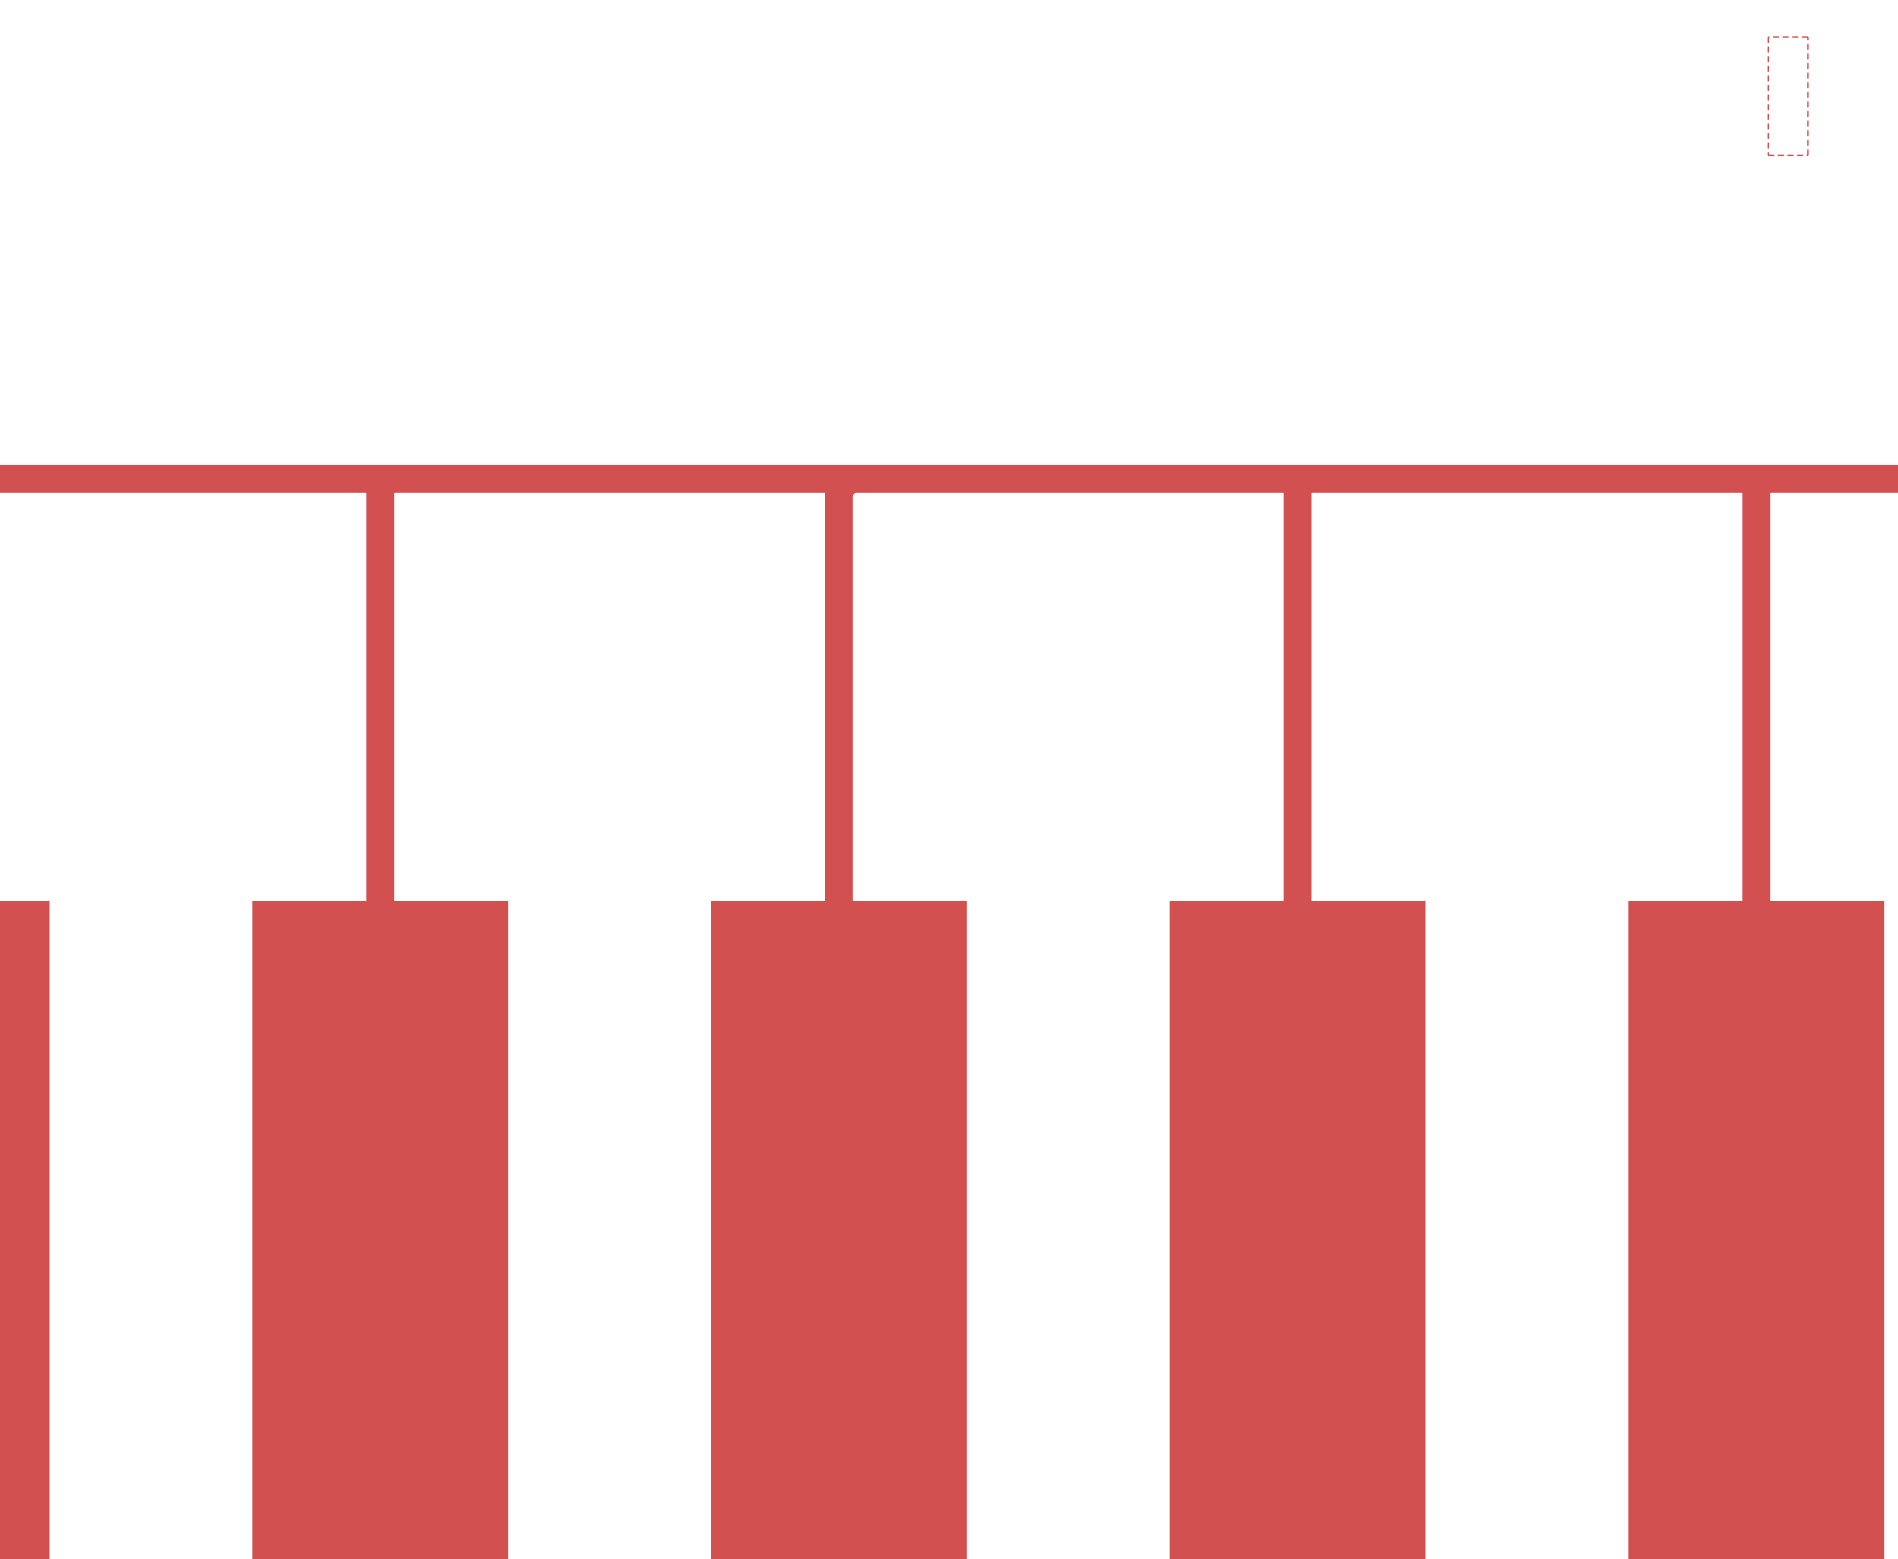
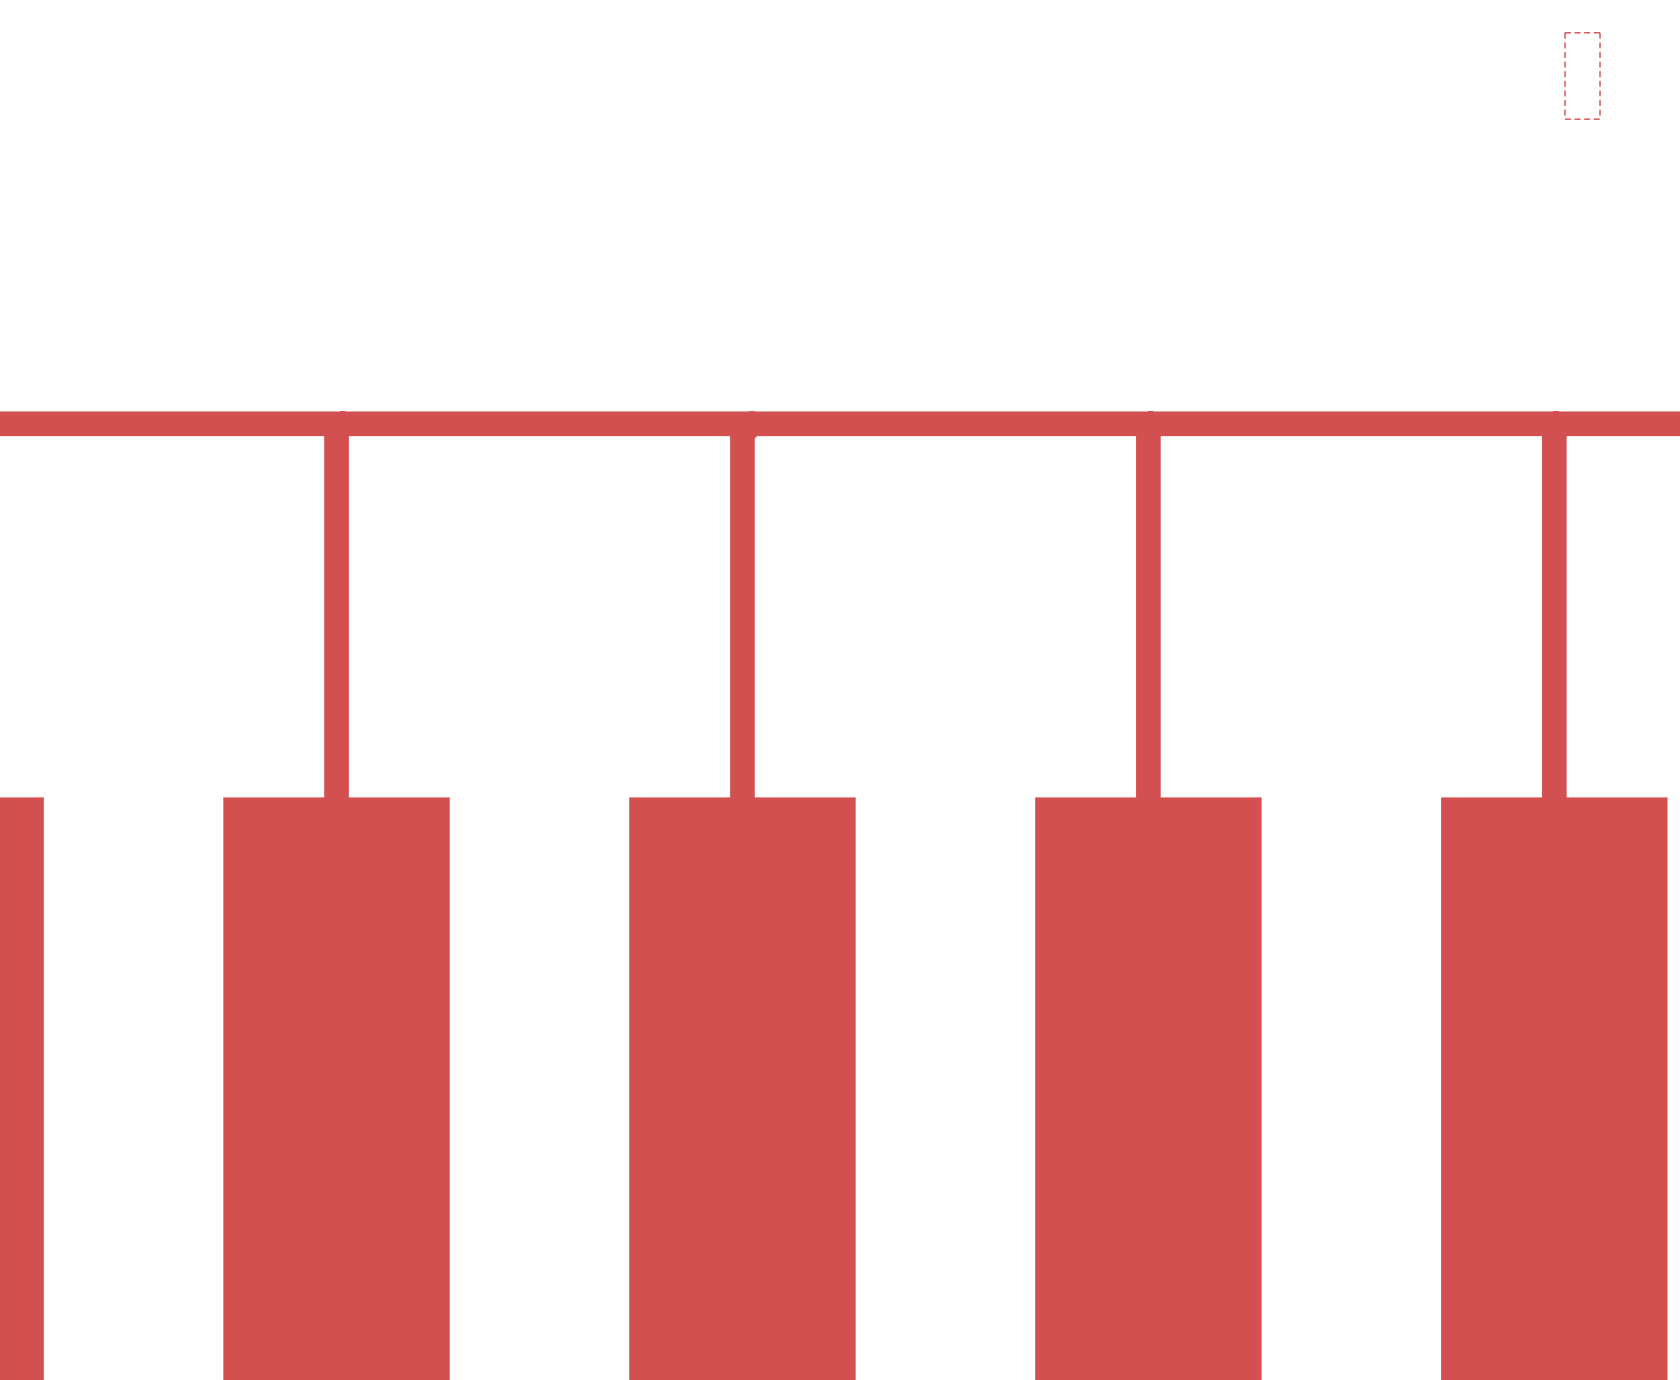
zone outline: (1768, 134) (1768, 155) (1807, 155) (1807, 134) -> (1564, 119) (1600, 119)

